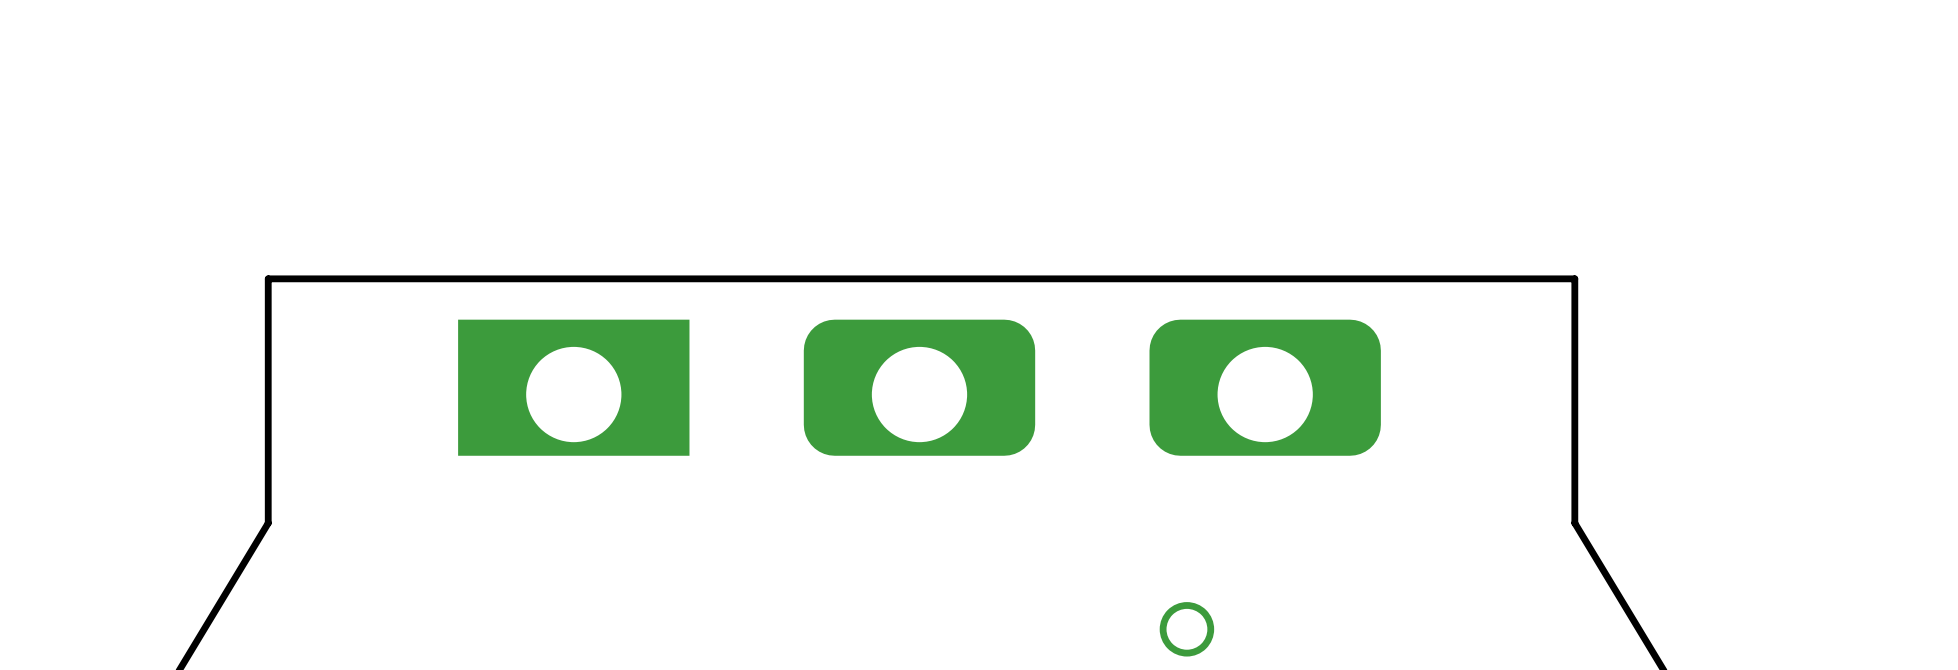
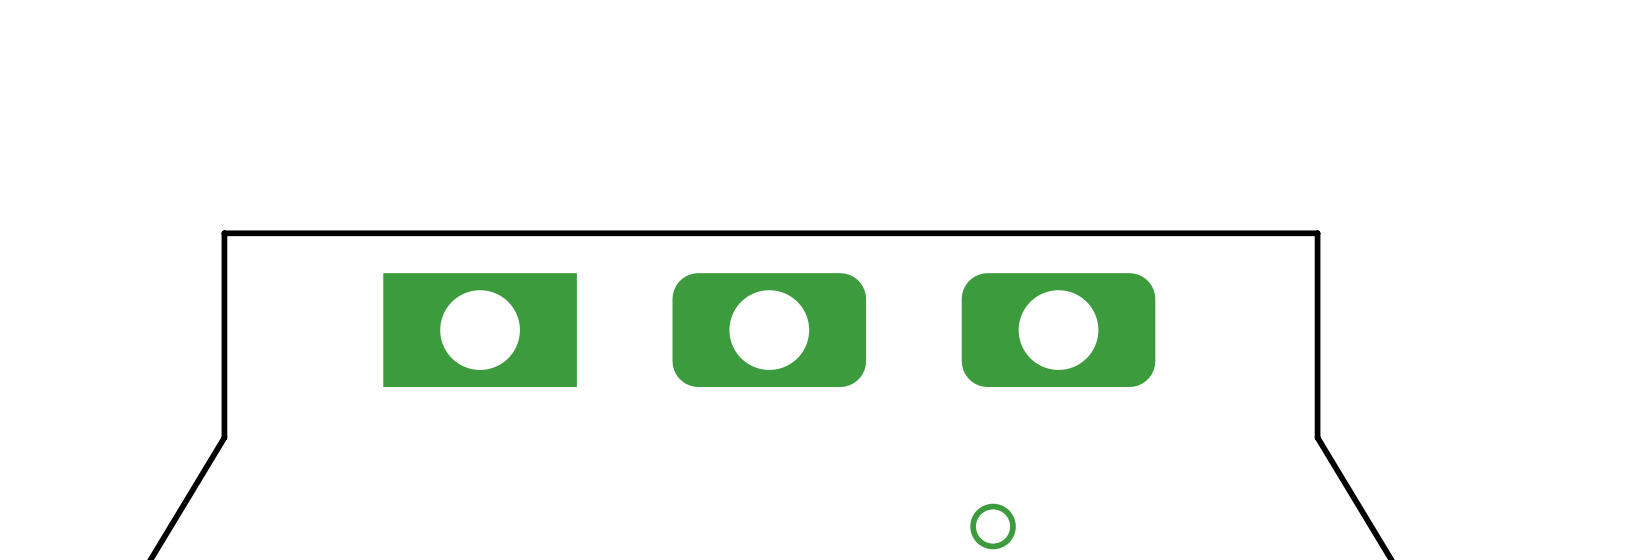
part footprint: [458, 319, 1381, 456] -> [383, 273, 1156, 388]

